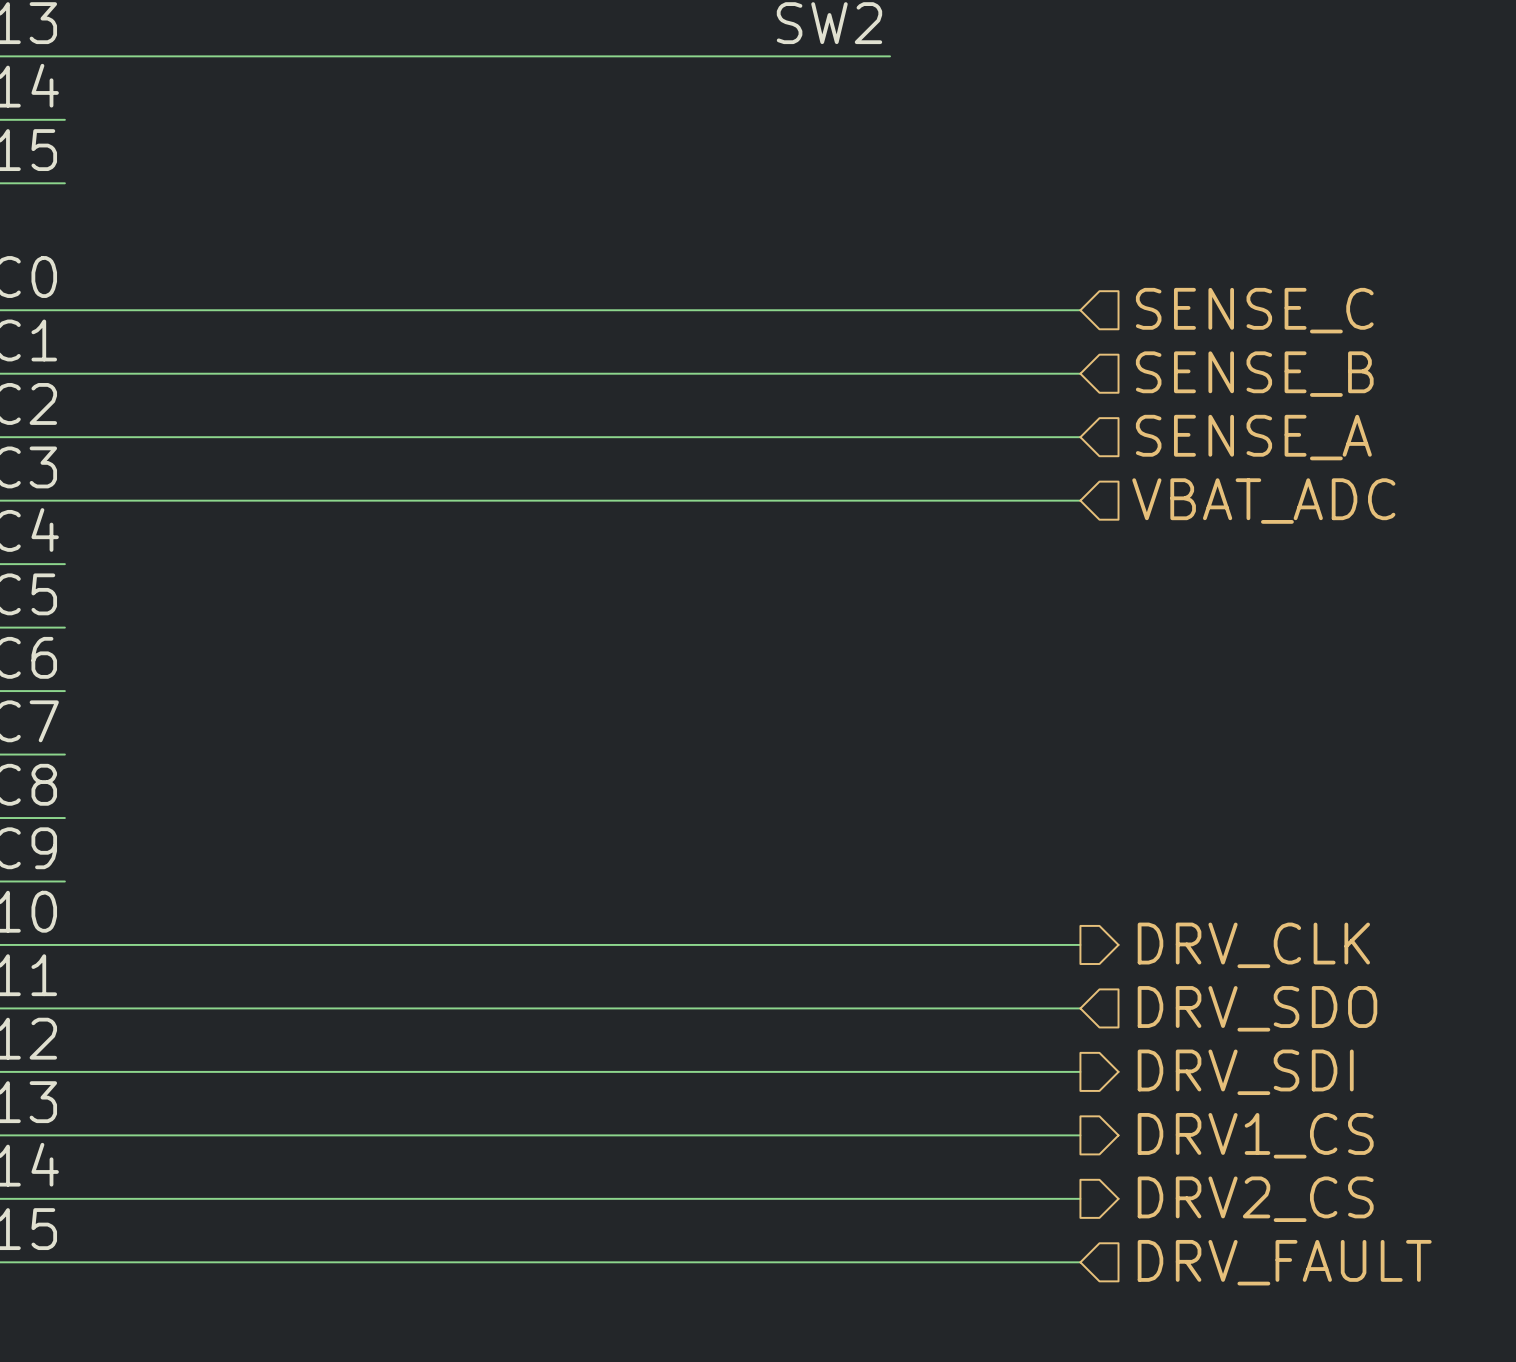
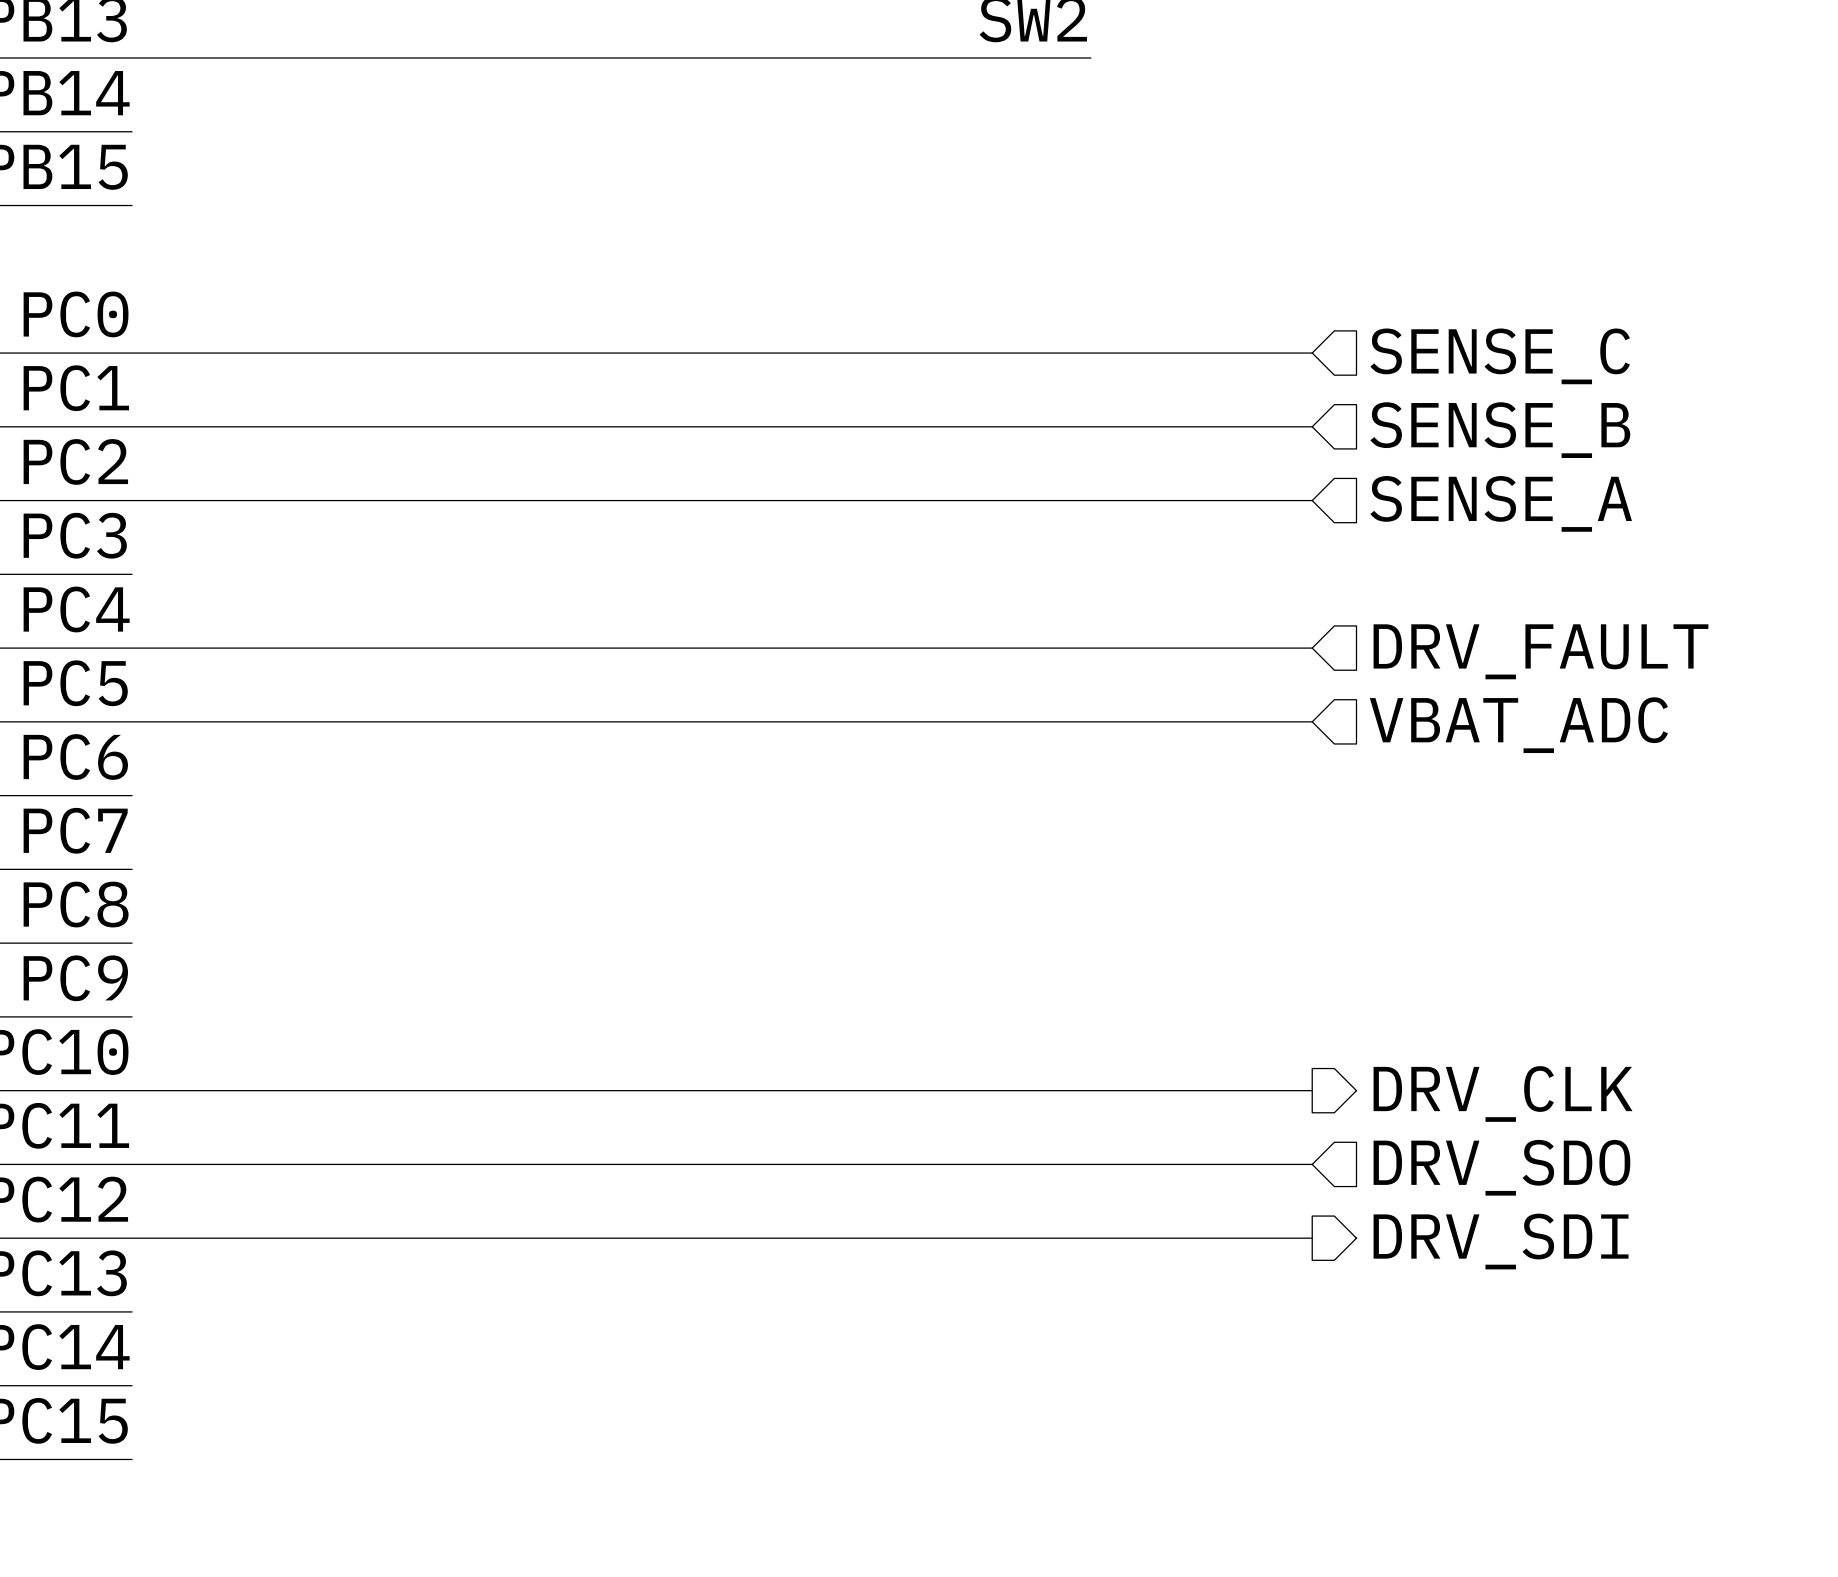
wire: (64, 500) (1080, 500) -> (132, 648) (1312, 648)
hierarchical label position: VBAT_ADC (1263, 501) -> VBAT_ADC (1518, 725)
hierarchical label: none -> DRV_FAULT (1540, 651)
wire: (64, 1135) (1080, 1135) -> (132, 721) (1312, 721)
hierarchical label: DRV1_CS (1255, 1135) -> none
wire: (64, 1198) (1080, 1198) -> none
hierarchical label: DRV2_CS (1255, 1199) -> none
wire: (64, 1262) (1080, 1262) -> none
hierarchical label: DRV_FAULT (1284, 1262) -> none

